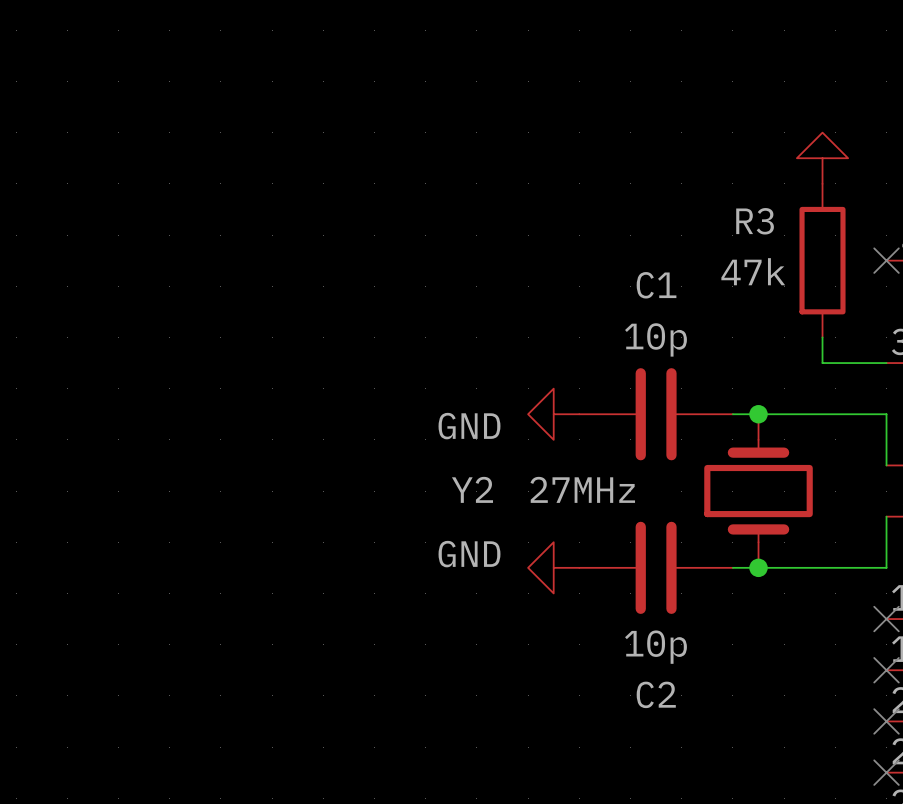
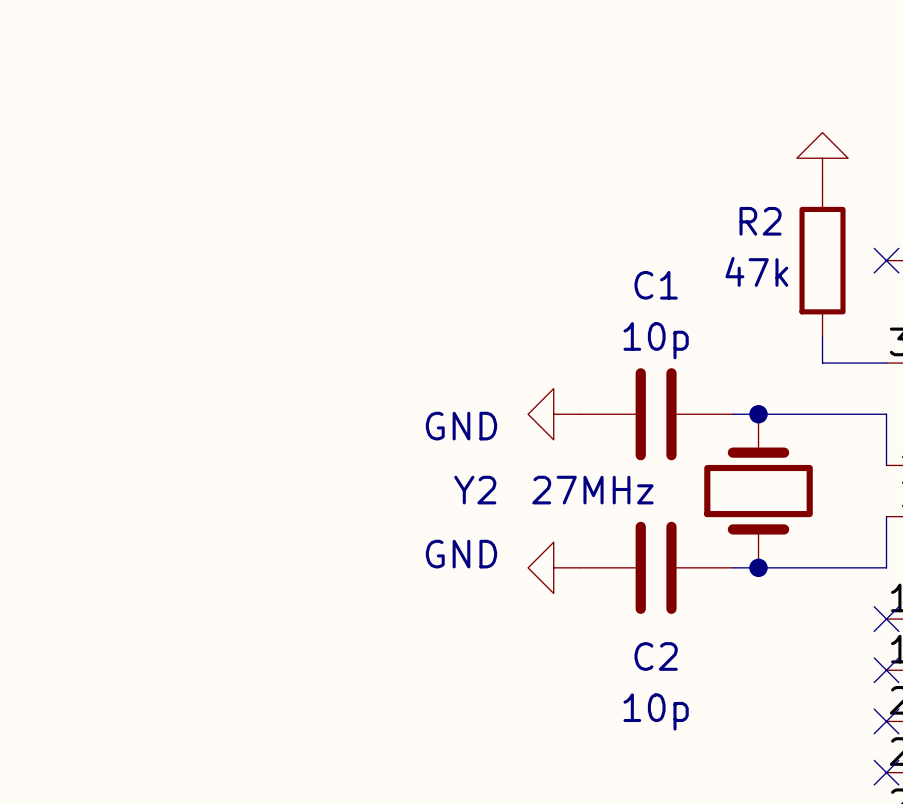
R3 name: R3 (755, 221) -> R2 (760, 221)
C2 value position: 10p (655, 647) -> 10p (656, 711)
C2 name position: C2 (656, 694) -> C2 (656, 656)

